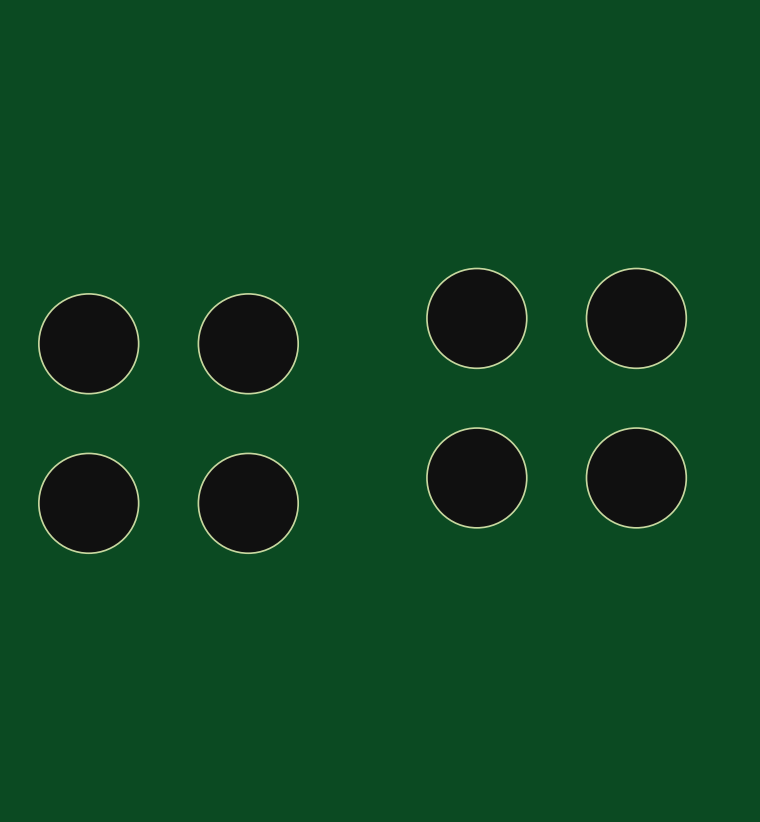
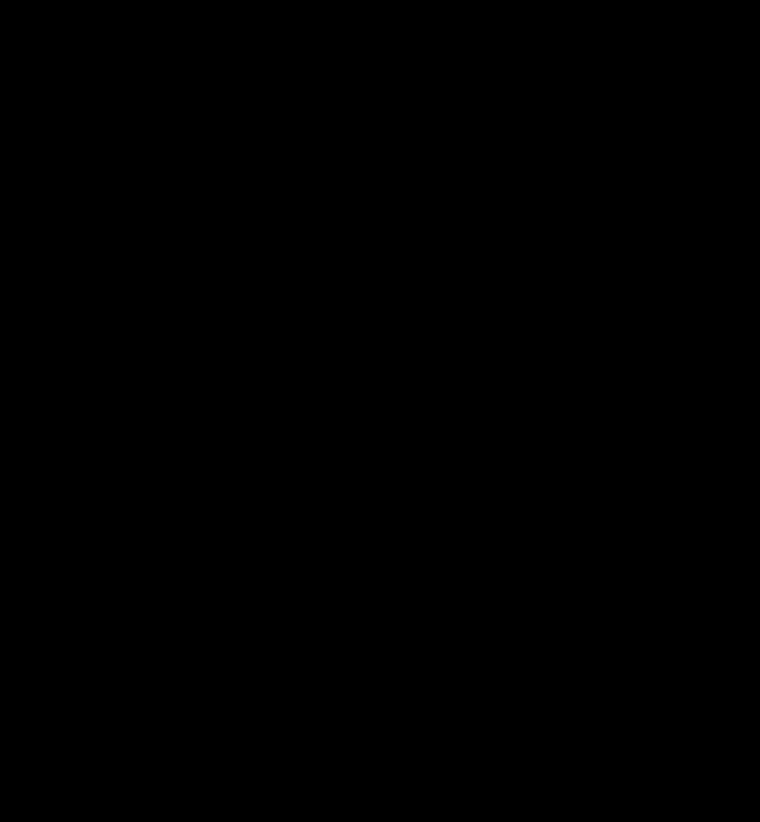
part: (476, 318) -> none
part: (636, 318) -> none
part: (88, 343) -> none
part: (248, 343) -> none
part: (476, 477) -> none
part: (636, 477) -> none
part: (88, 503) -> none
part: (248, 503) -> none

